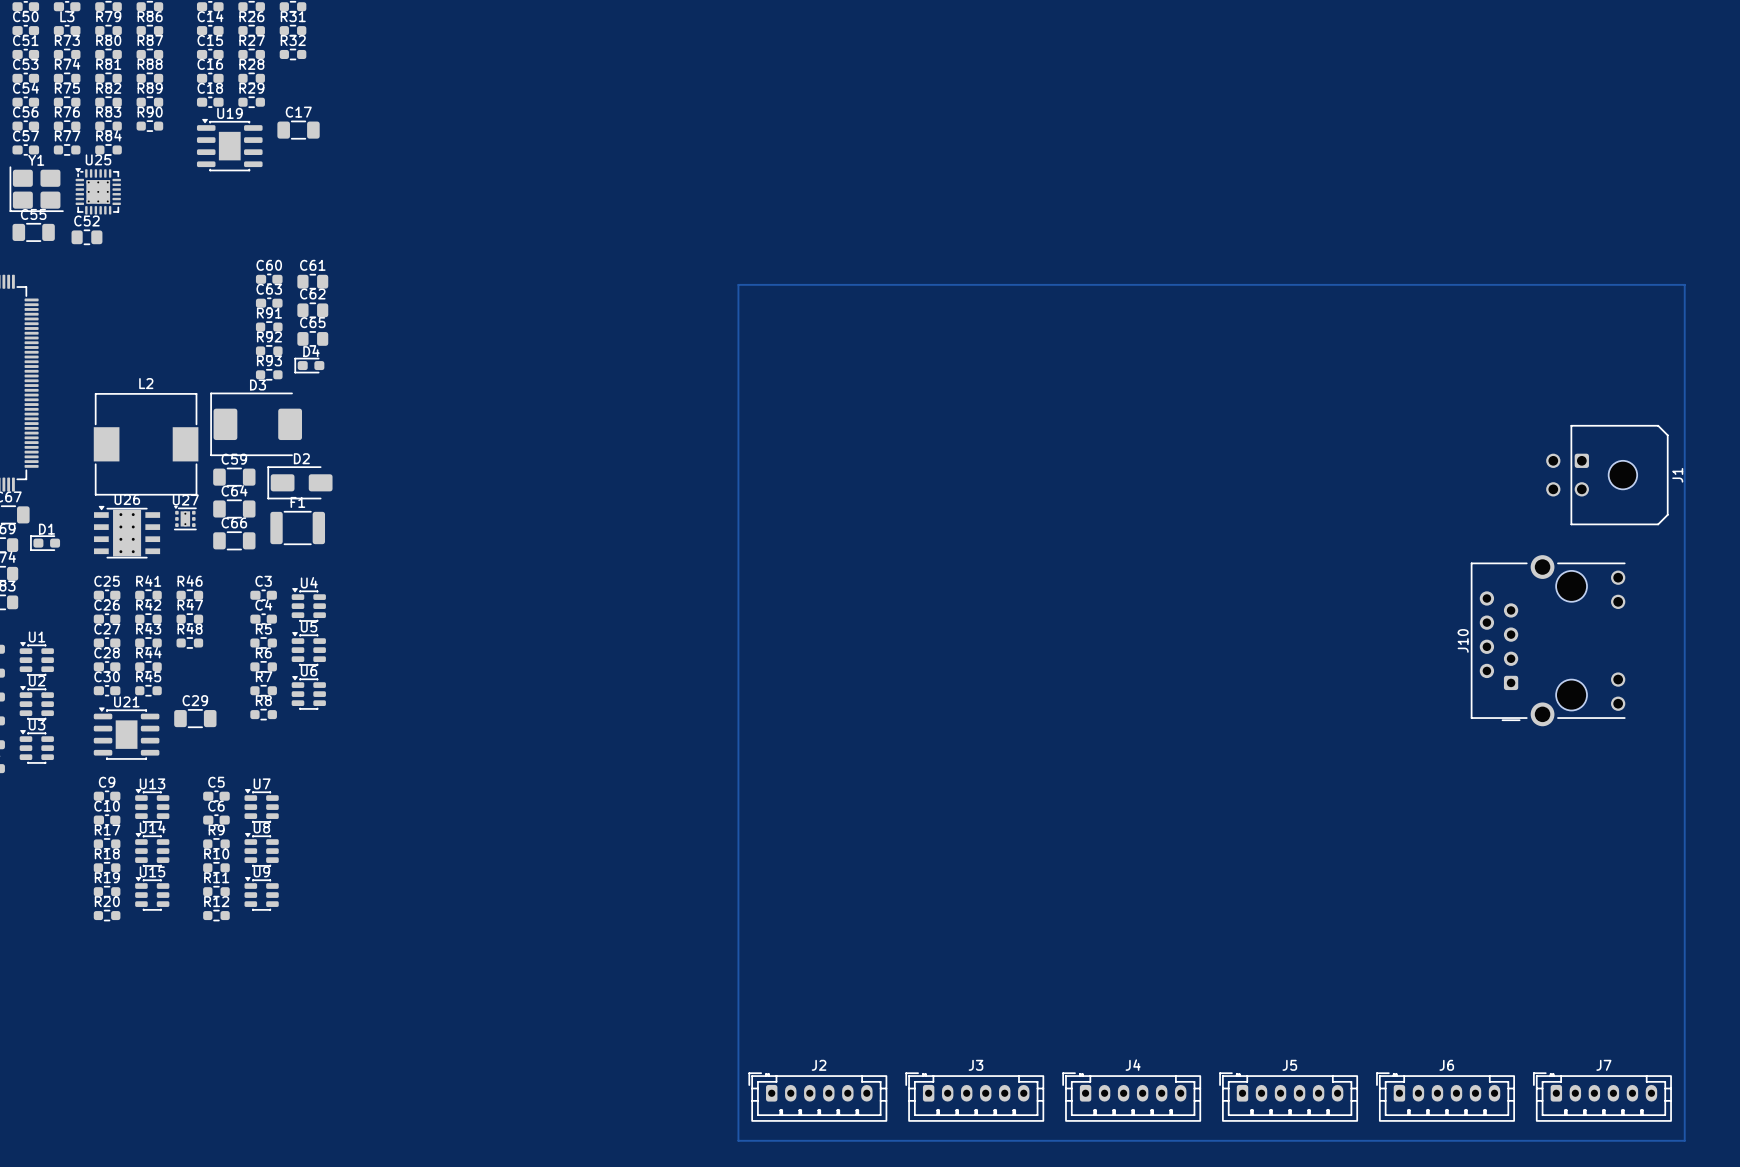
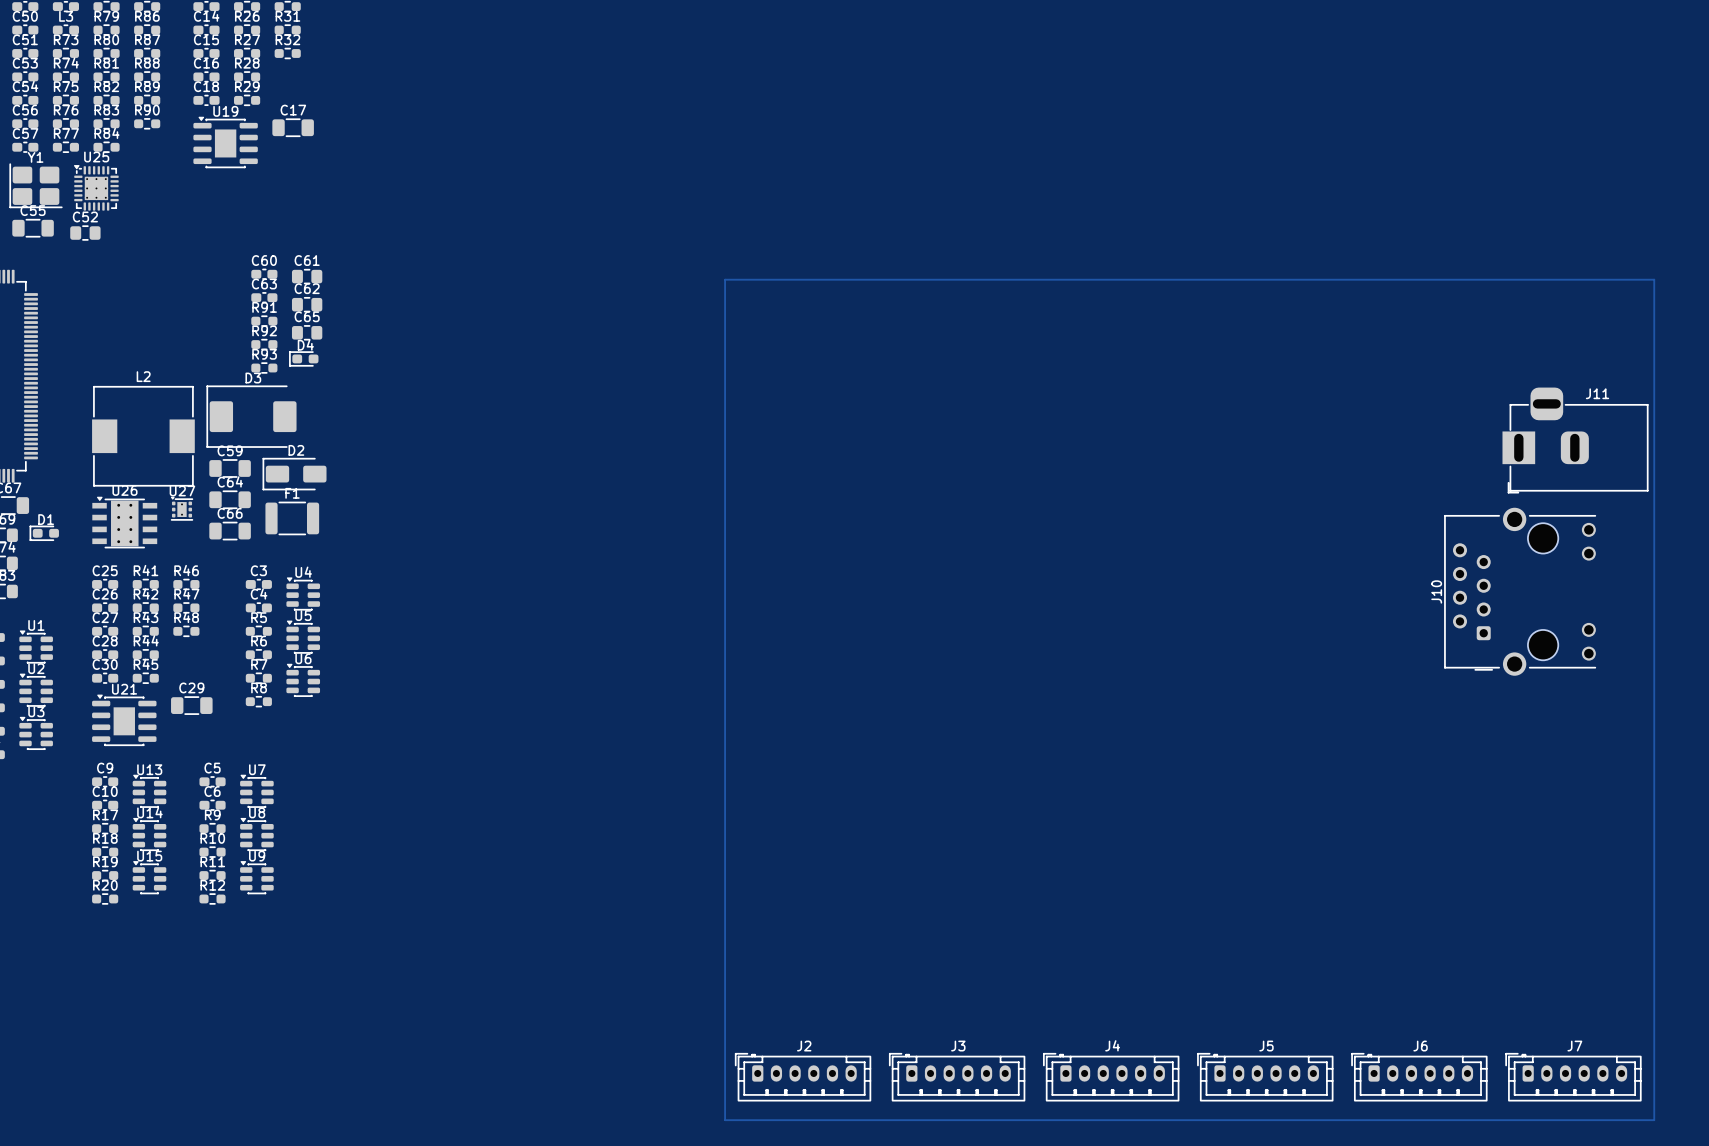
J11: none -> (1575, 440)
J1: (1607, 475) -> none
J10 position: (1548, 640) -> (1520, 591)

